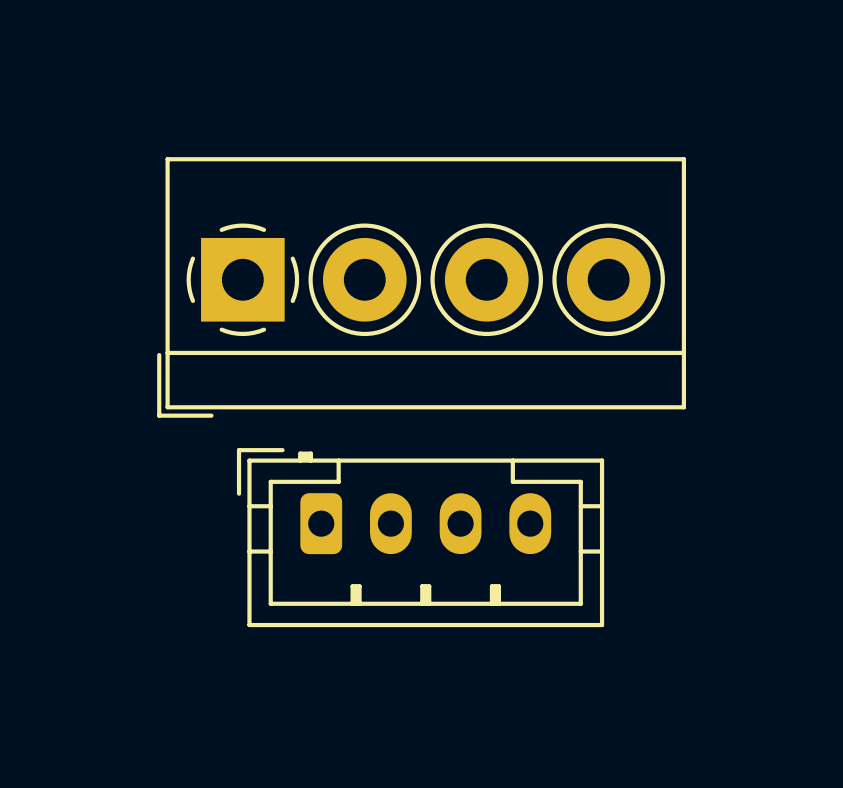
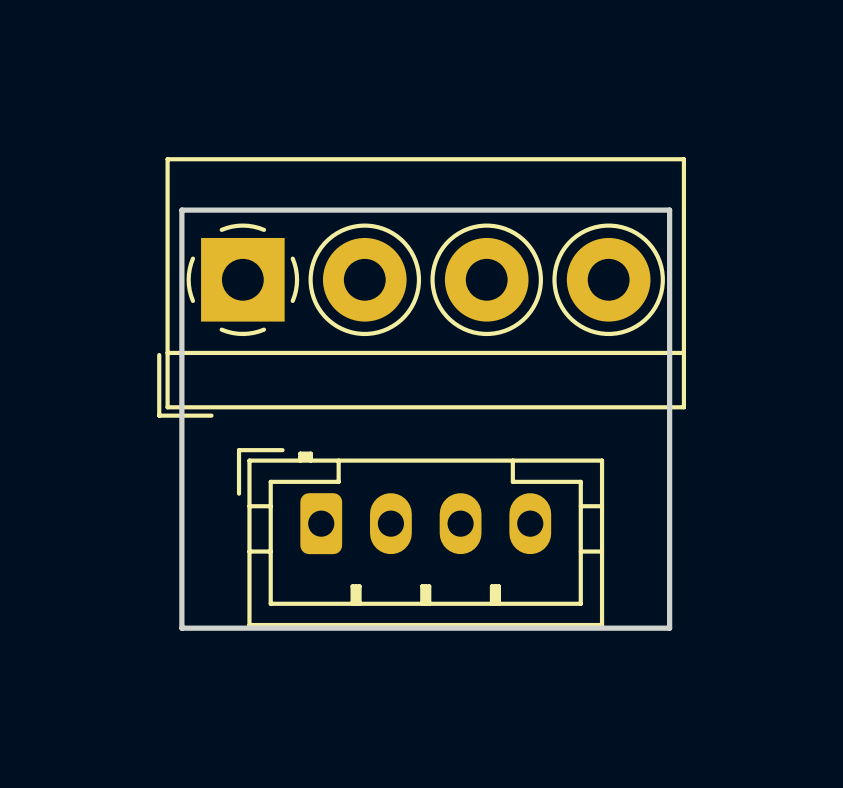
board edge: none -> (181, 210) (181, 628) (669, 628) (669, 210) (181, 210)

